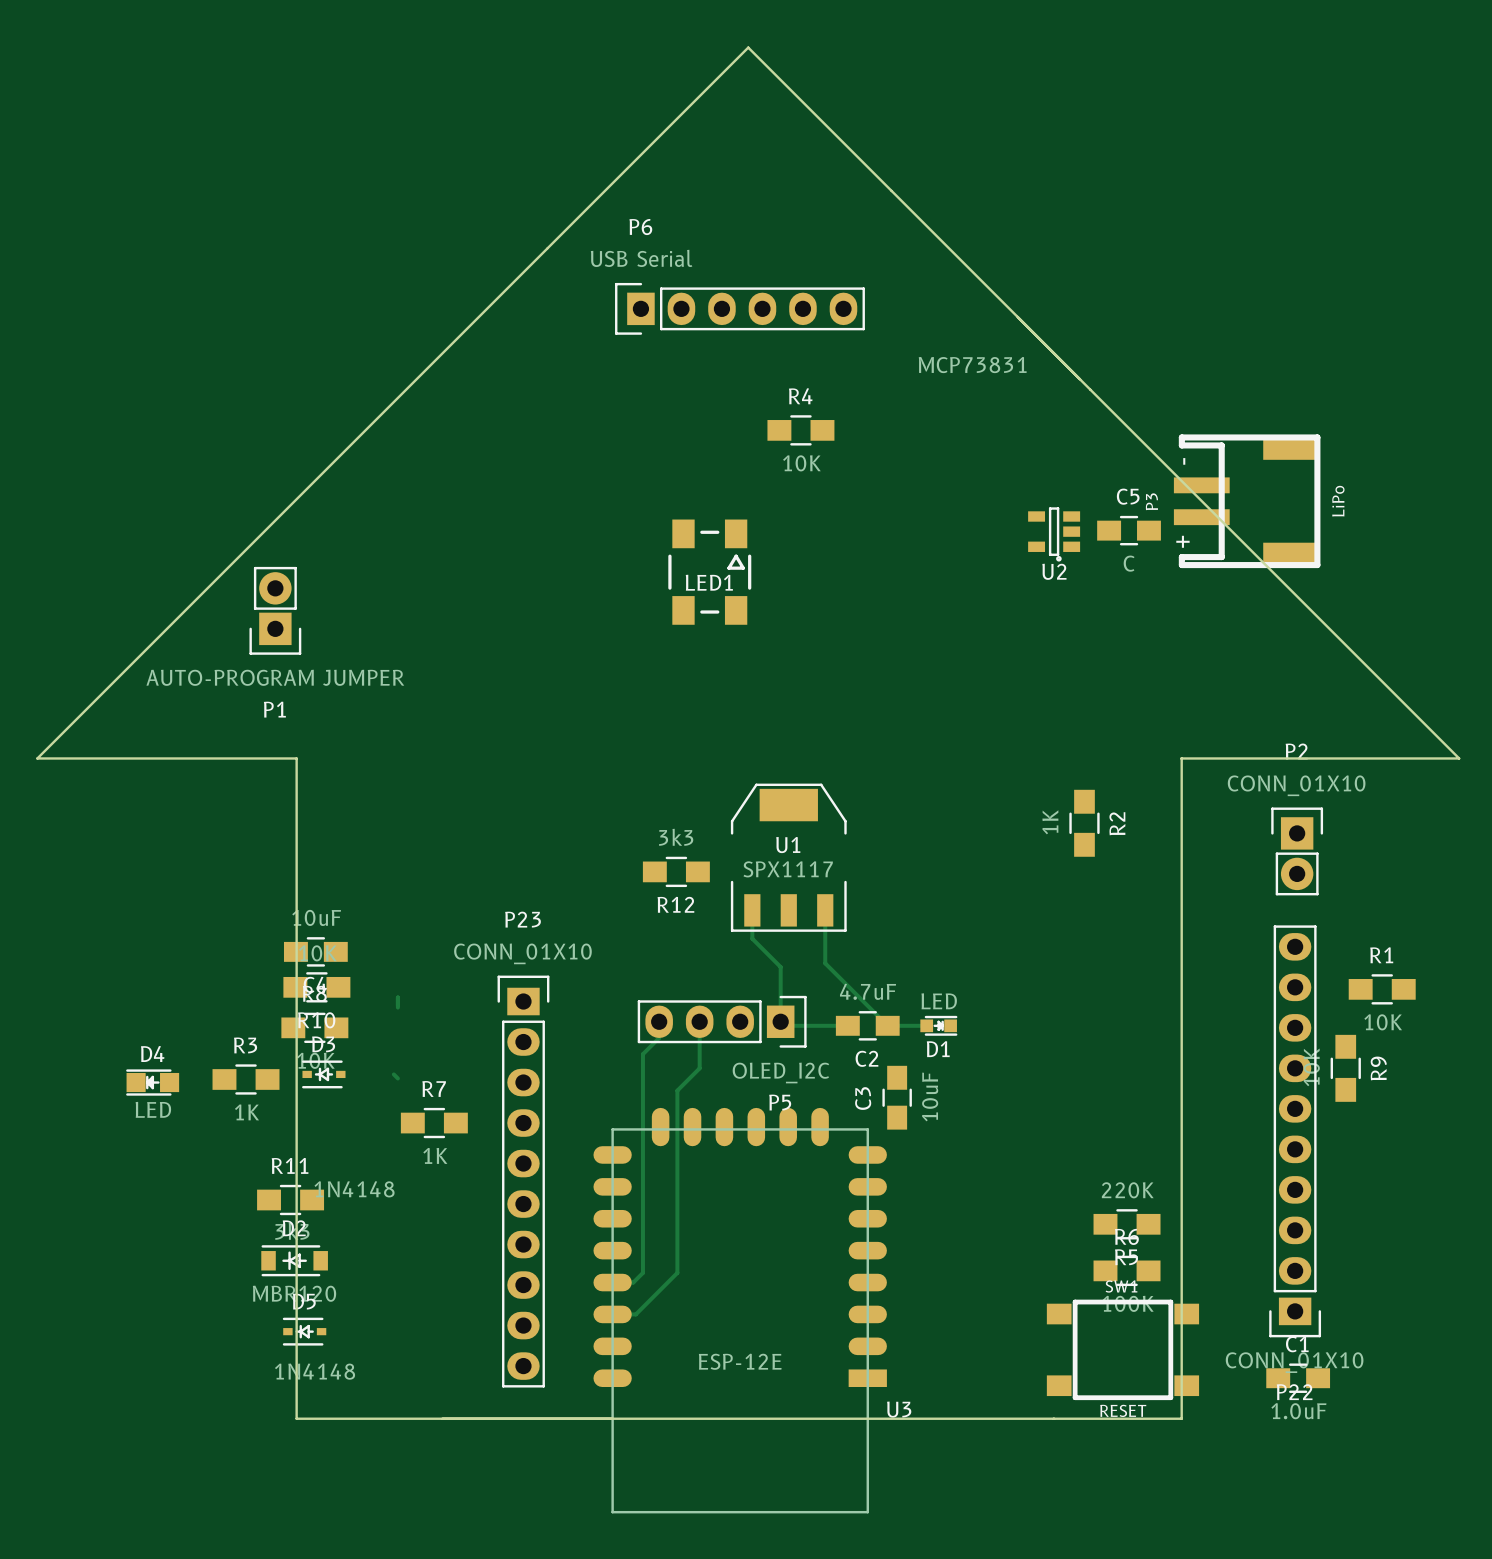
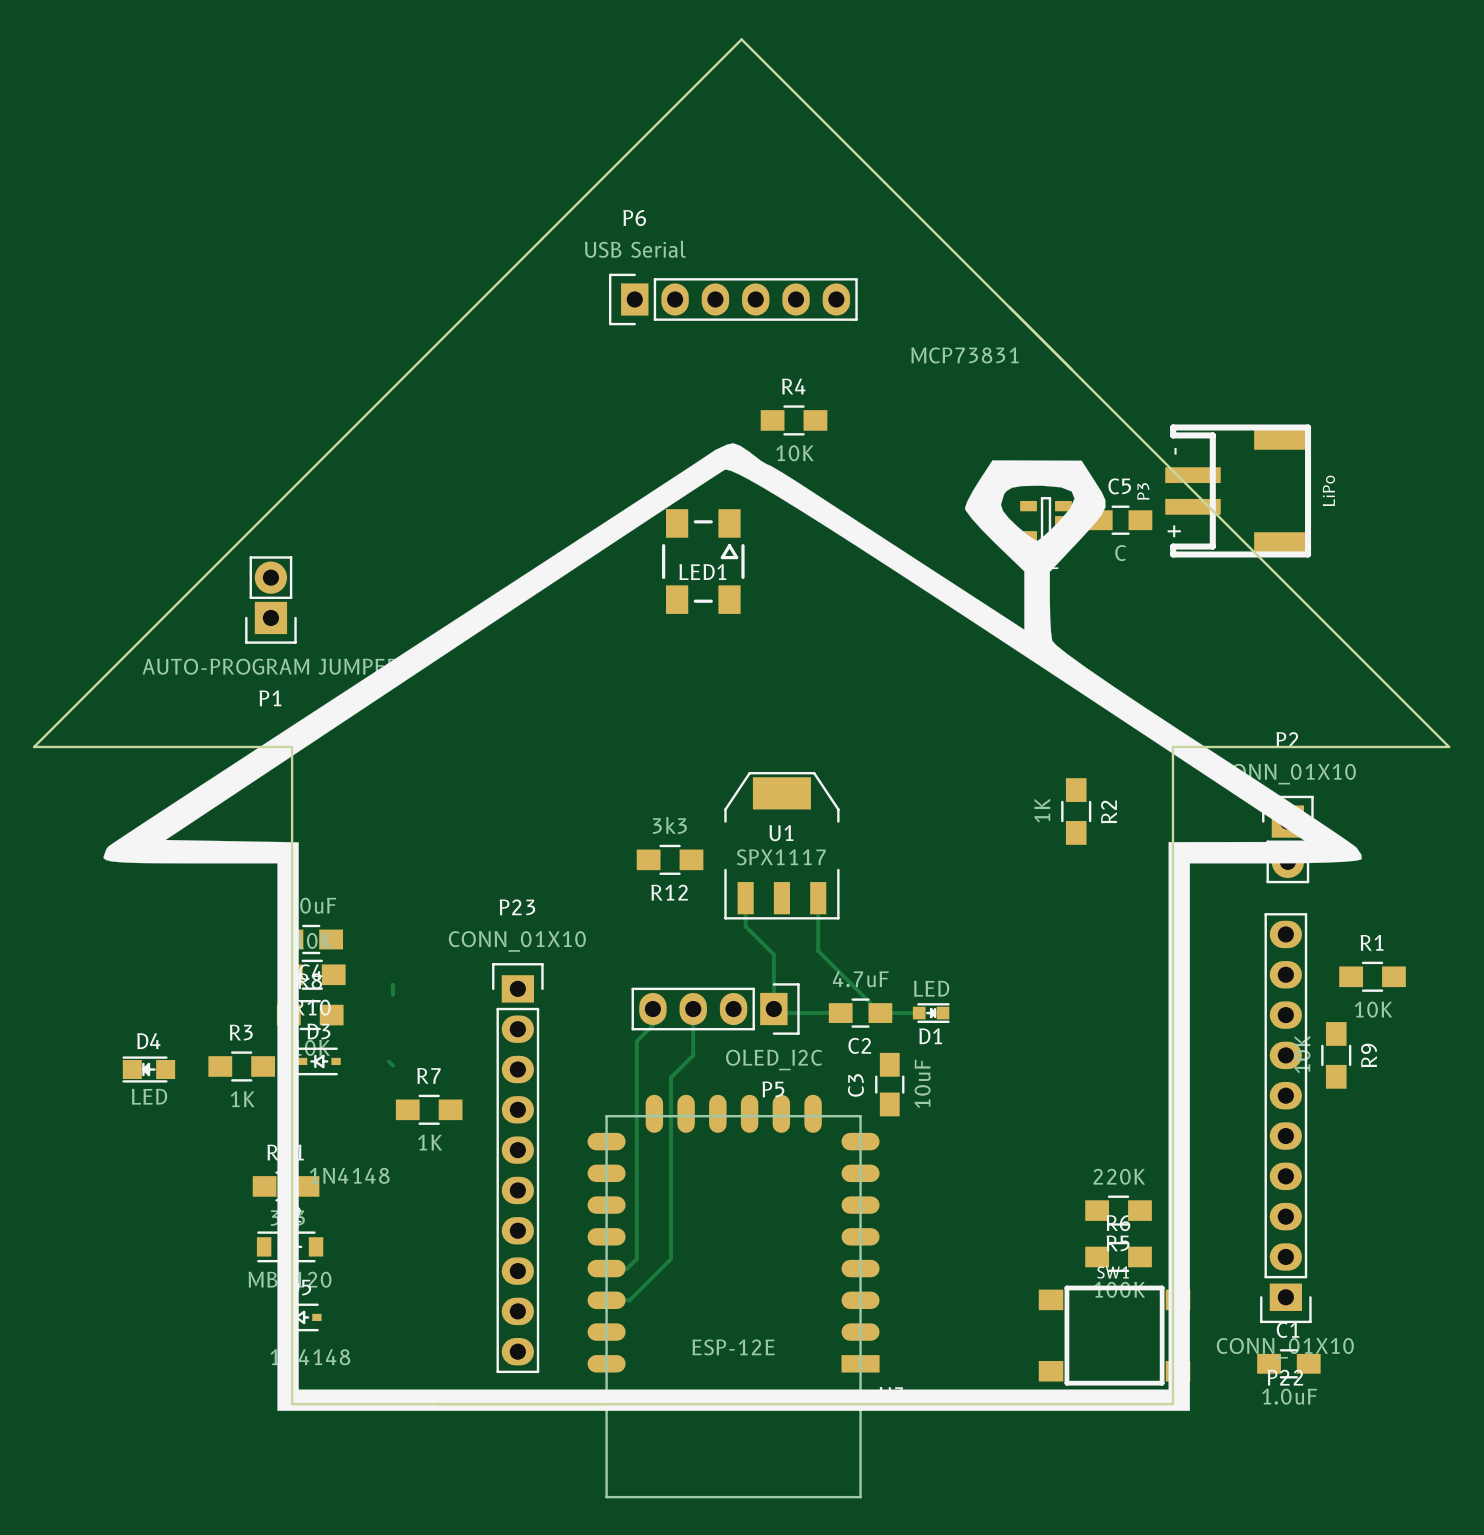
drawing: none -> [103, 443, 1362, 1411]

